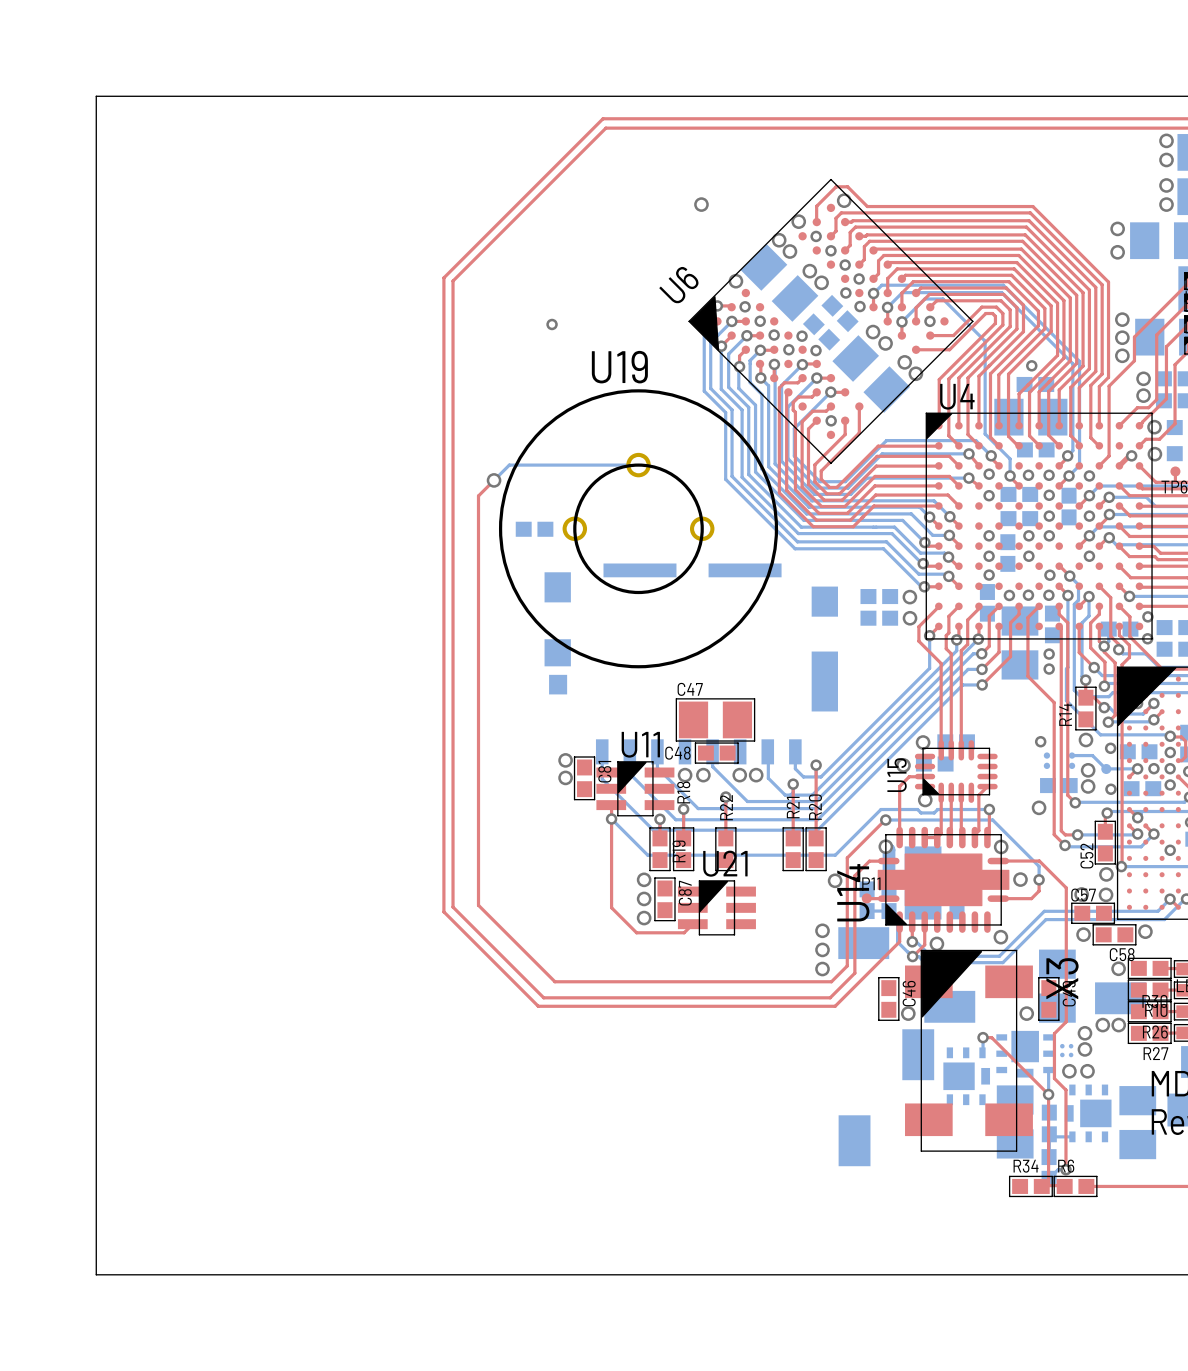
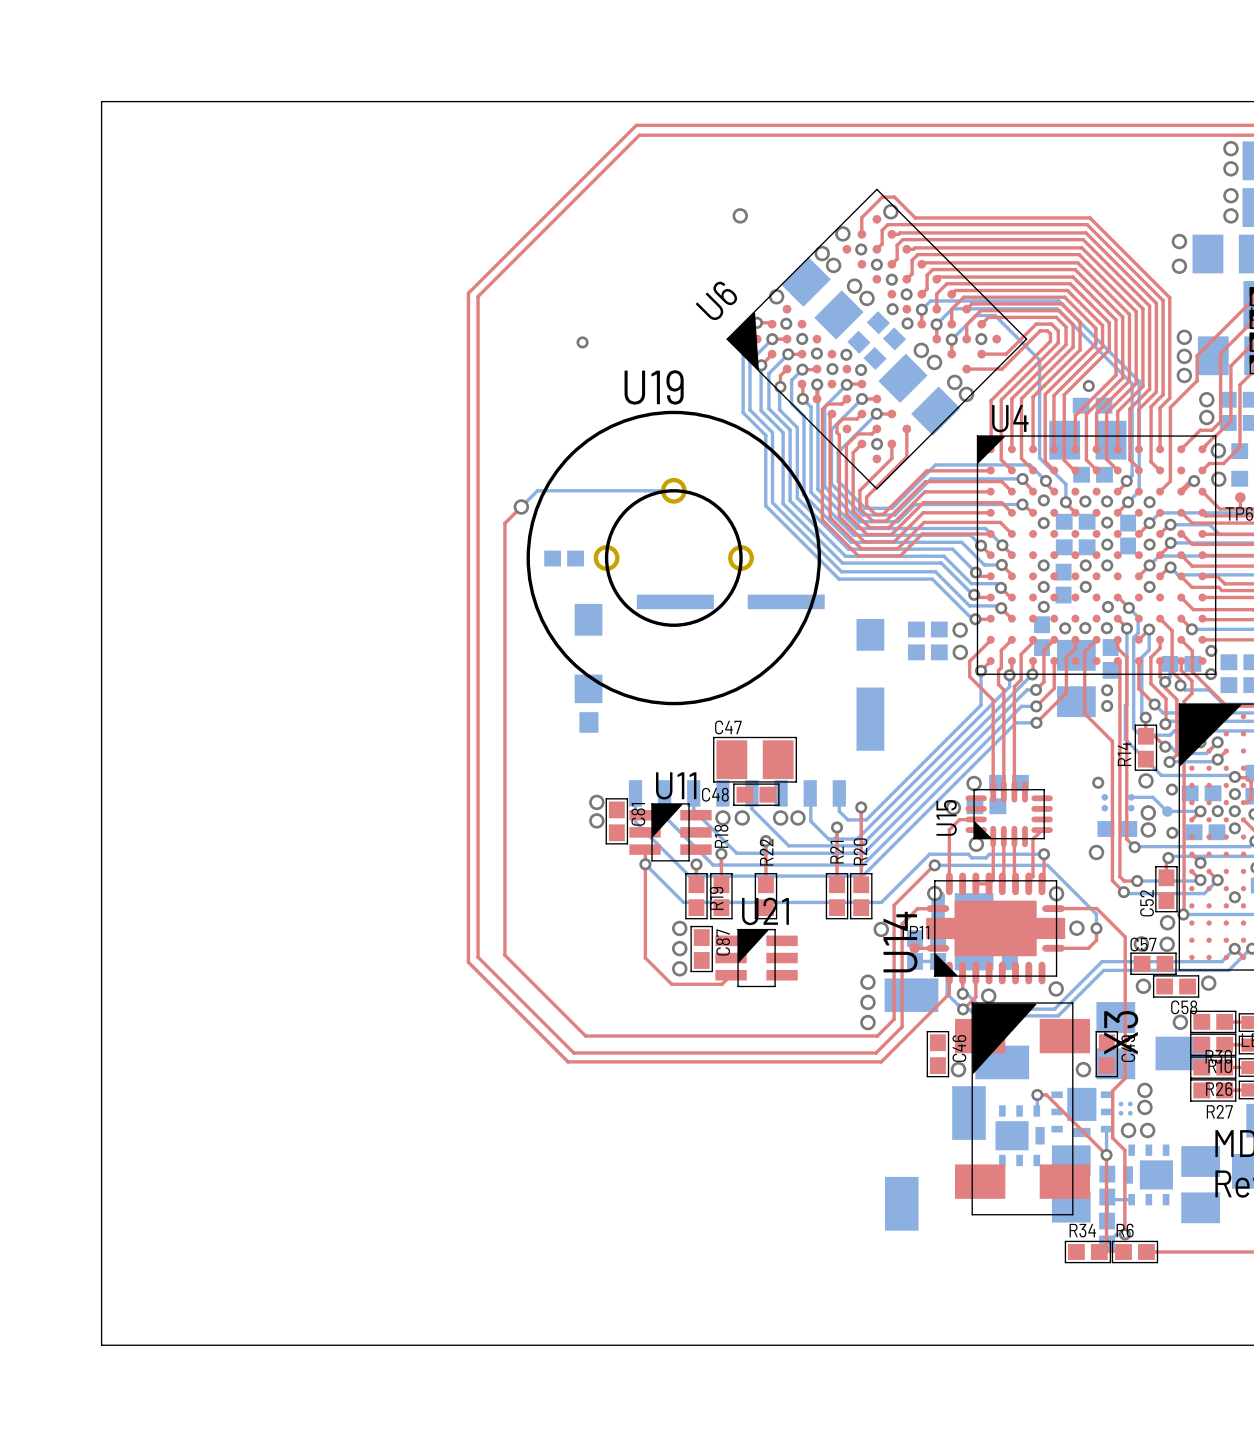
via: (1102, 1025) -> none
via: (1118, 1025) -> none

